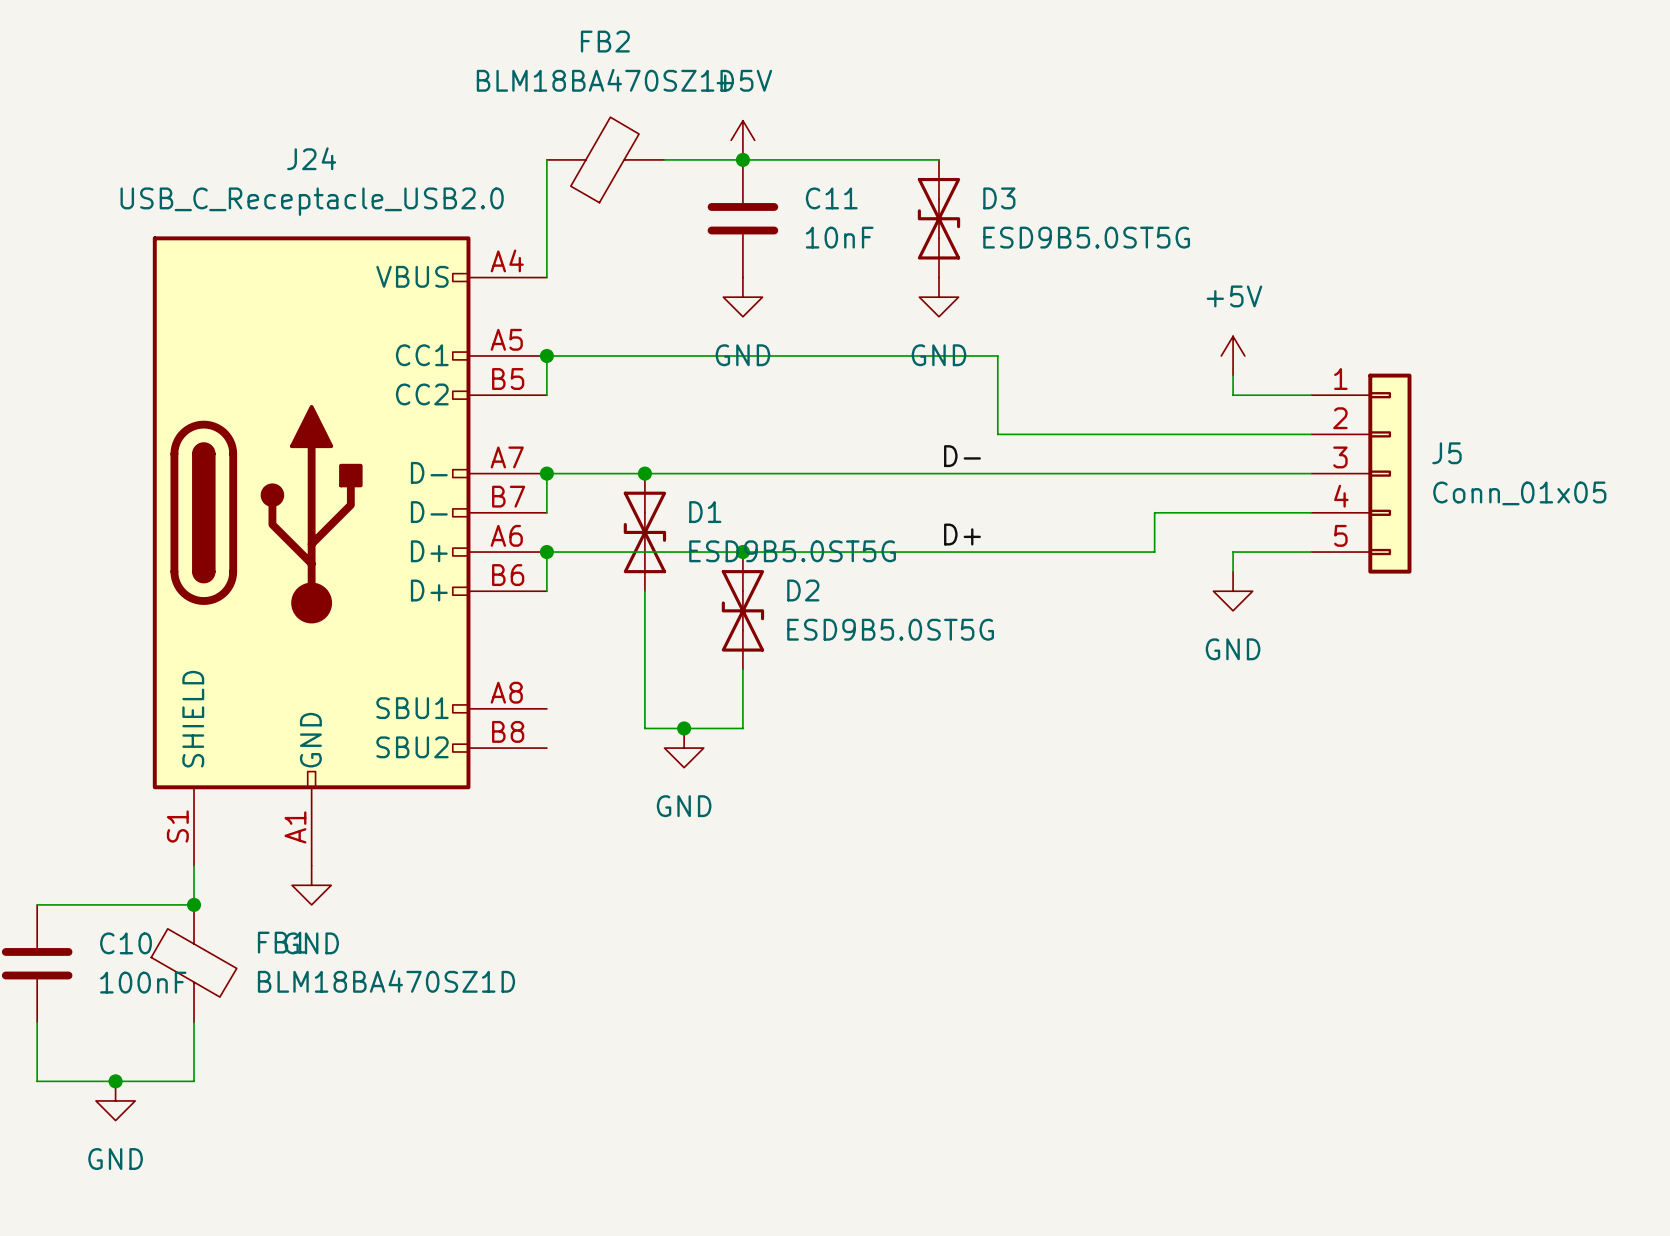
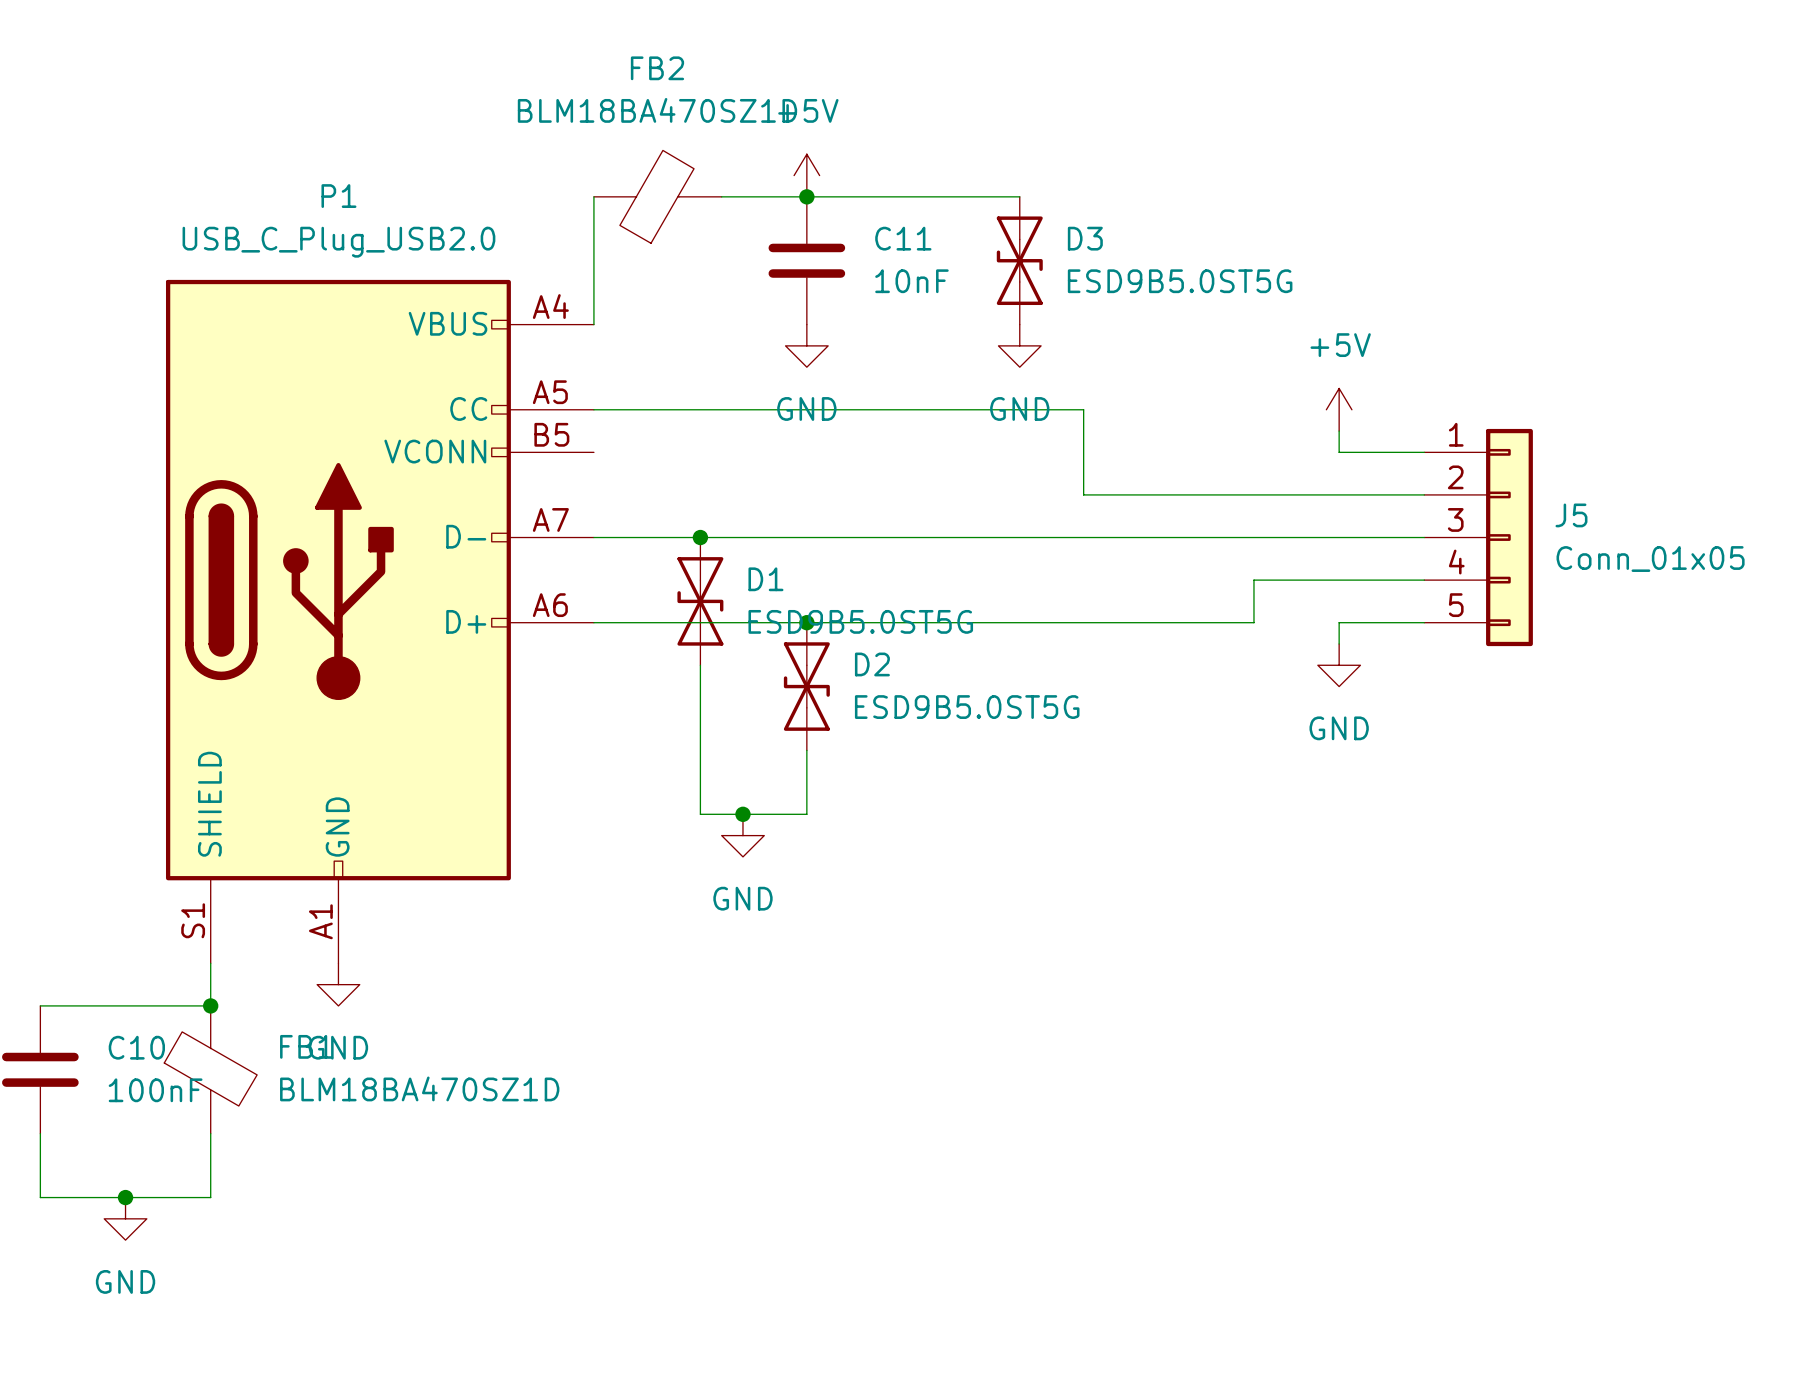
wire: (546, 355) (546, 395) -> none
junction: (546, 355) -> none
label: D- (962, 456) -> none
wire: (546, 473) (546, 512) -> none
junction: (546, 473) -> none
label: D+ (962, 534) -> none
J24: USB_C_Receptacle_USB2.0 (349, 551) -> none
P1: none -> USB_C_Plug_USB2.0 (379, 621)
wire: (546, 552) (546, 591) -> none
junction: (546, 552) -> none

